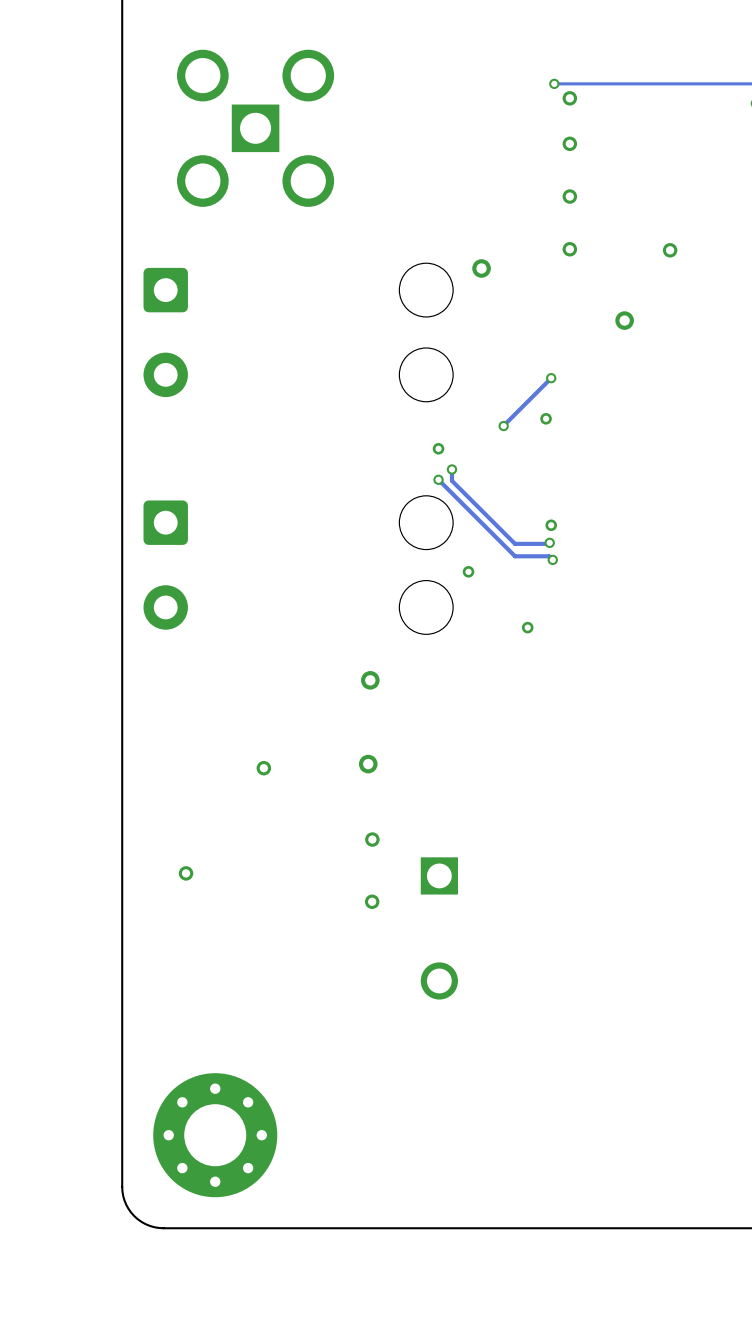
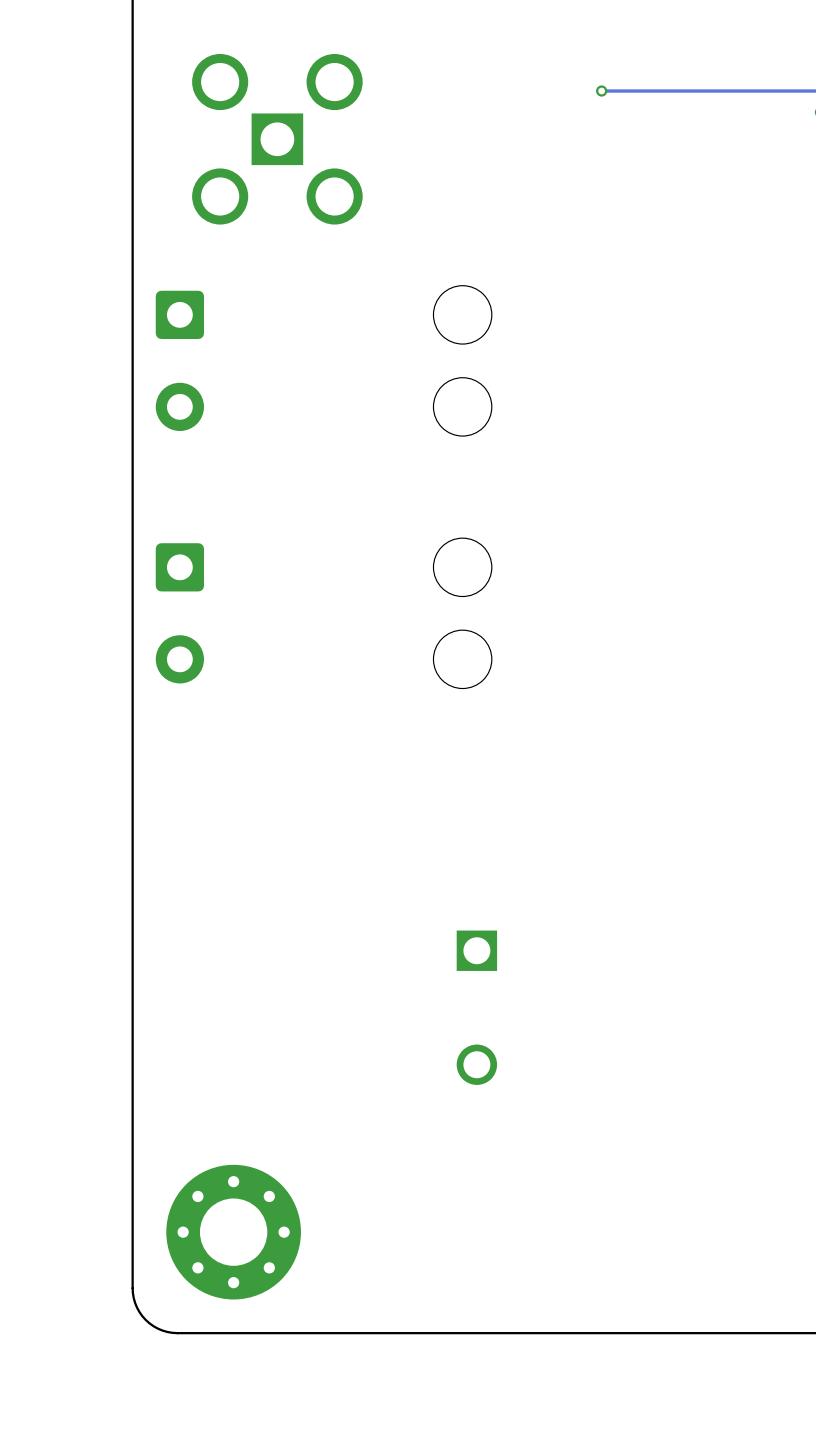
via: (569, 98) -> none
via: (569, 143) -> none
via: (569, 196) -> none
via: (569, 249) -> none
via: (670, 250) -> none
via: (481, 268) -> none
via: (624, 320) -> none
track: (551, 378) (503, 425) -> none
via: (551, 378) -> none
via: (546, 418) -> none
via: (503, 426) -> none
via: (438, 448) -> none
track: (451, 469) (451, 480) (515, 543) (549, 542) -> none
via: (451, 469) -> none
track: (438, 479) (515, 556) (549, 556) (552, 559) -> none
via: (438, 479) -> none
via: (551, 525) -> none
via: (549, 542) -> none
via: (552, 559) -> none
via: (468, 571) -> none
via: (527, 627) -> none
via: (370, 680) -> none
via: (368, 764) -> none
via: (263, 768) -> none
via: (372, 839) -> none
via: (186, 873) -> none
via: (372, 901) -> none

